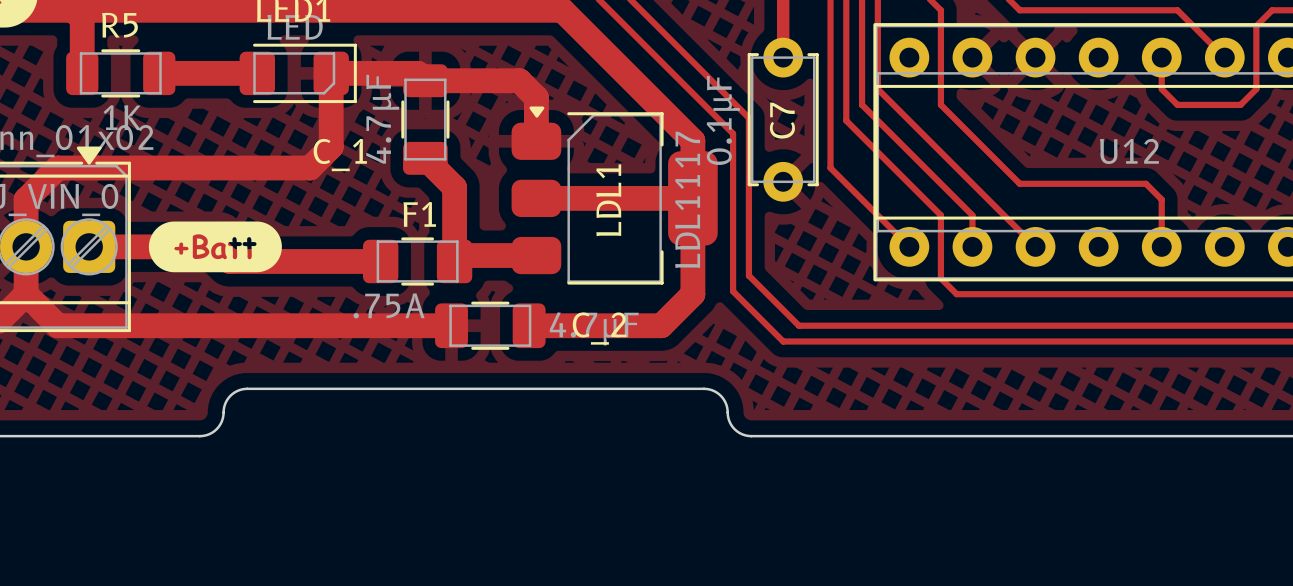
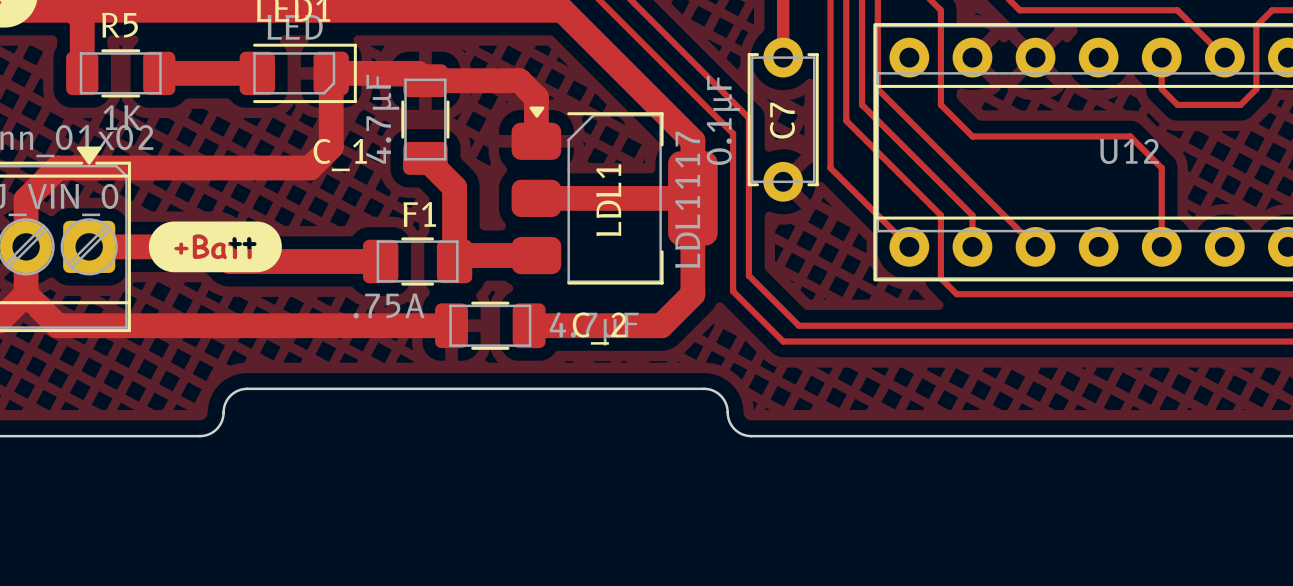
track: (972, 136) (1019, 183) (1145, 183) (1161, 199) -> (972, 136) (1130, 136) (1161, 168) (1161, 199)

